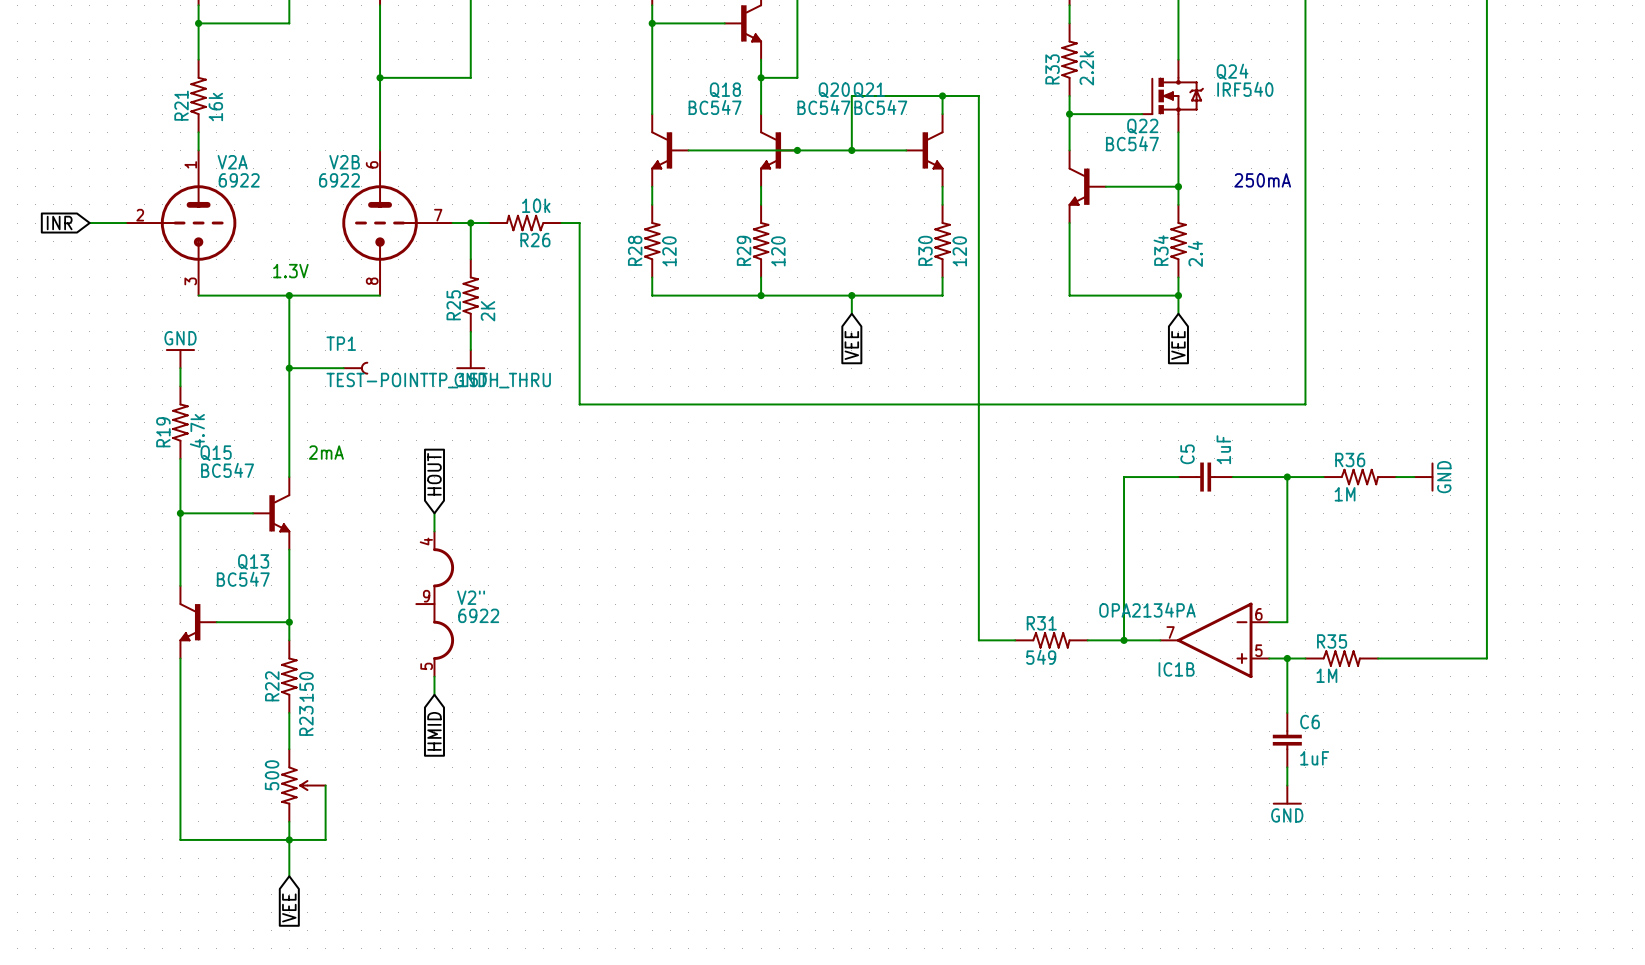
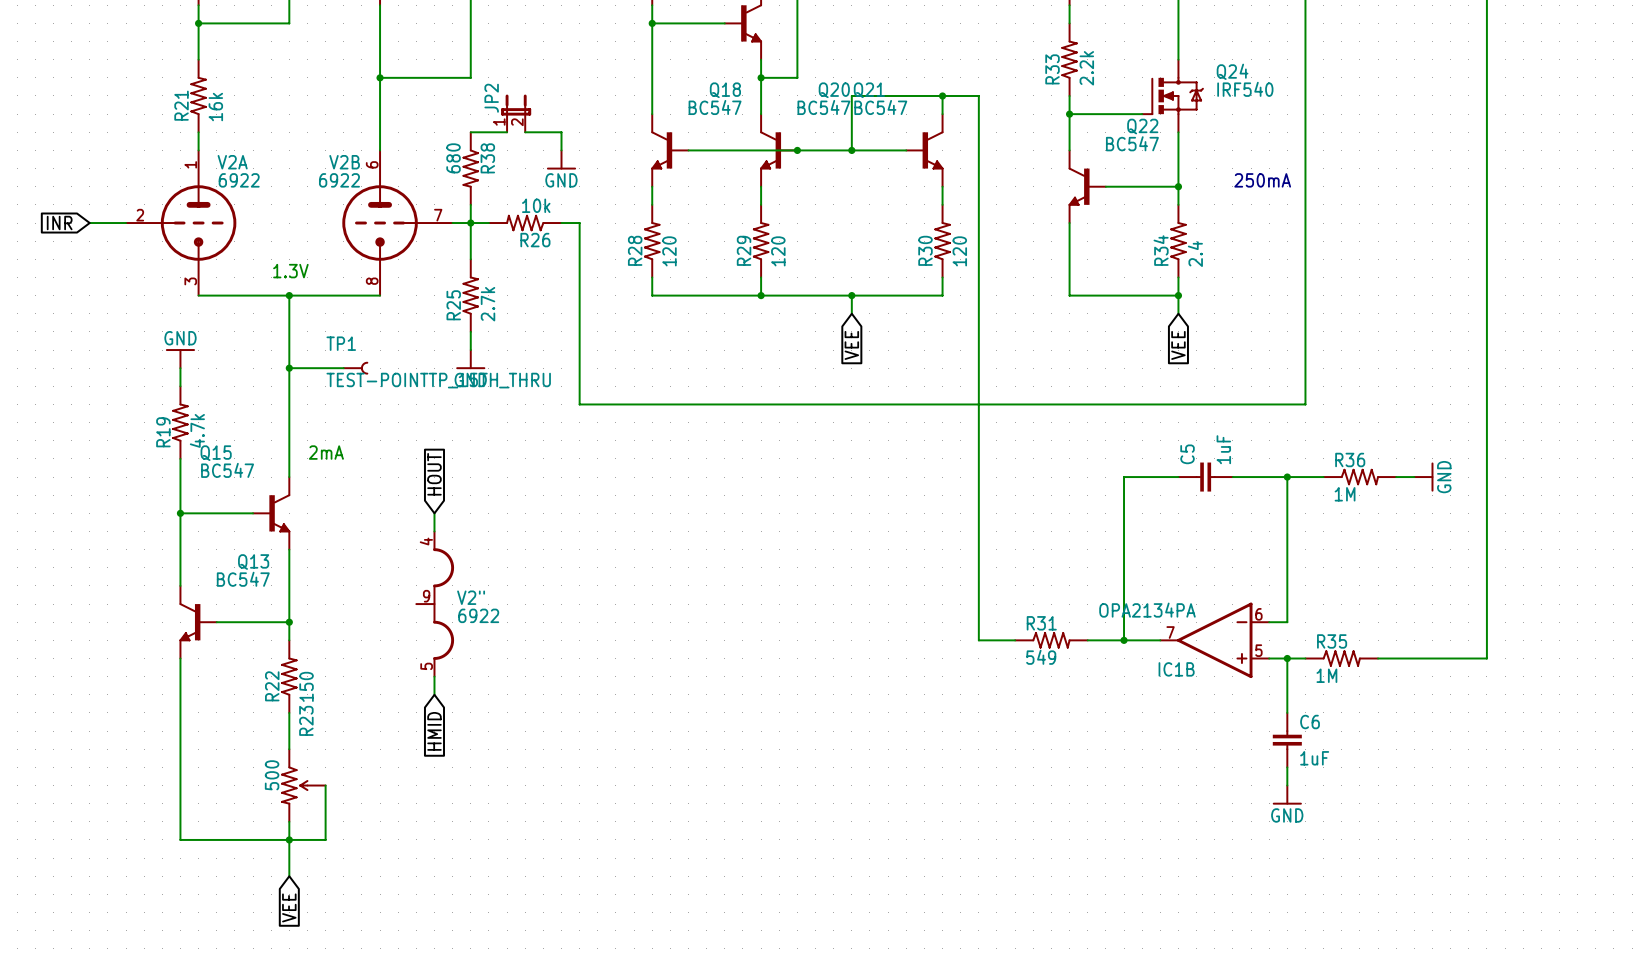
JP2: none -> (516, 113)
wire: none -> (470, 132) (507, 132)
wire: none -> (525, 132) (561, 132) (561, 150)
power symbol: none -> GND (561, 159)
R38: none -> 680 (470, 168)
wire: none -> (470, 204) (470, 223)
R25 value: 2K (488, 311) -> 2.7k (488, 304)

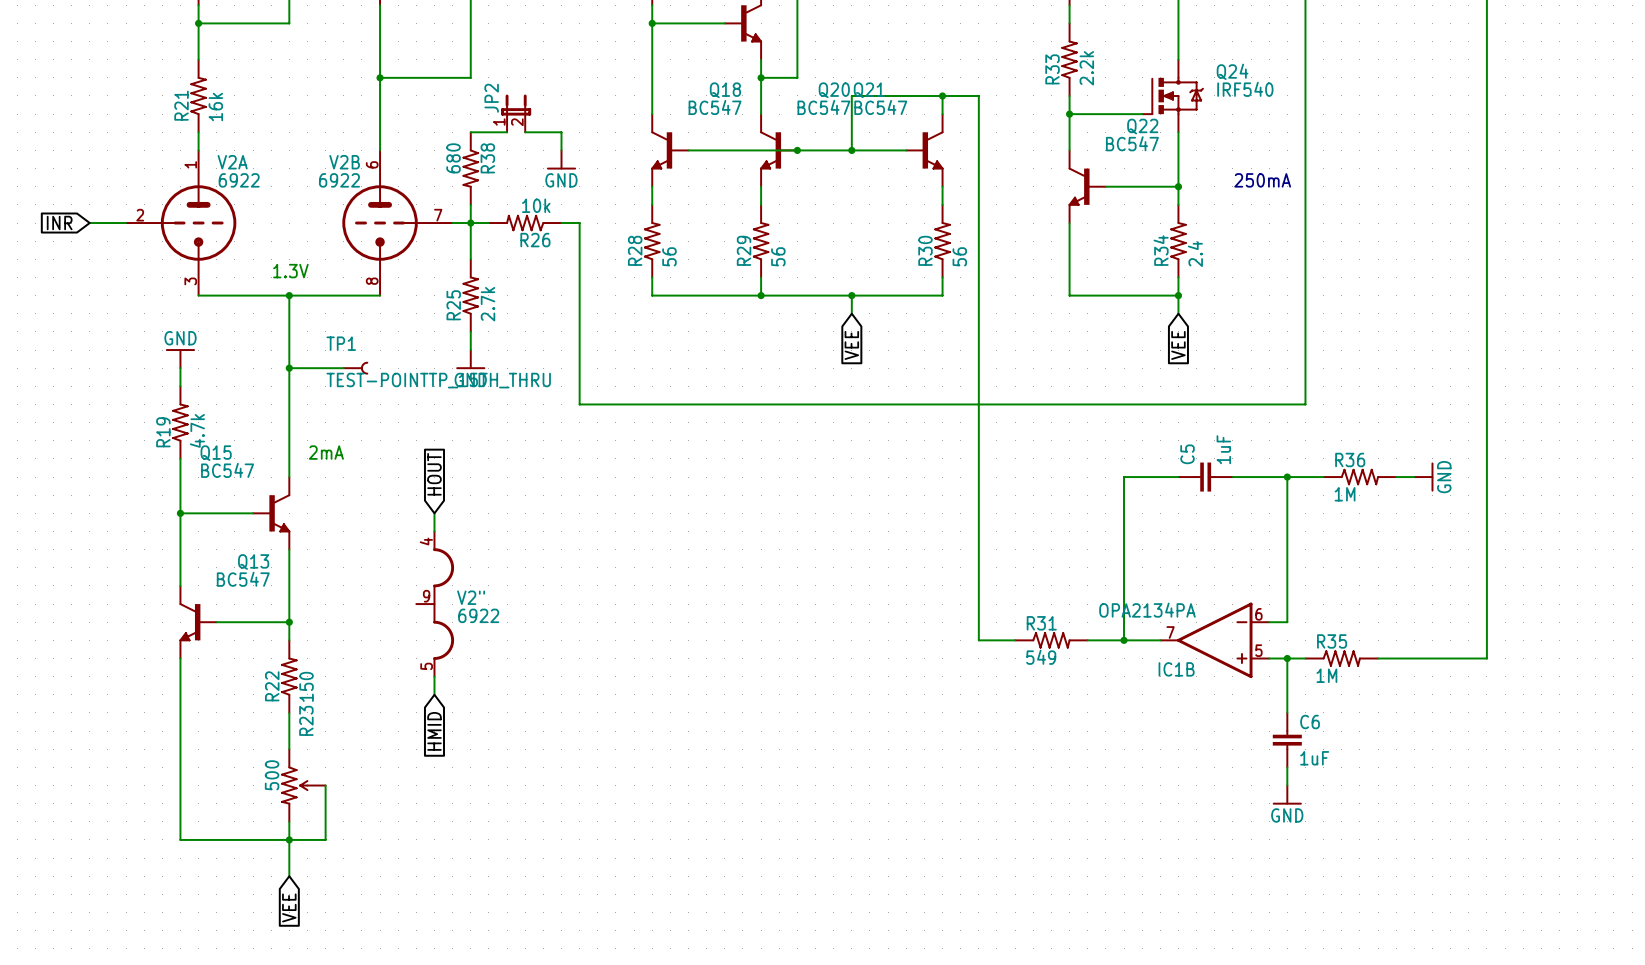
R28 value: 120 (669, 251) -> 56 (669, 256)
R29 value: 120 (778, 251) -> 56 (778, 256)
R30 value: 120 (959, 251) -> 56 (959, 256)

